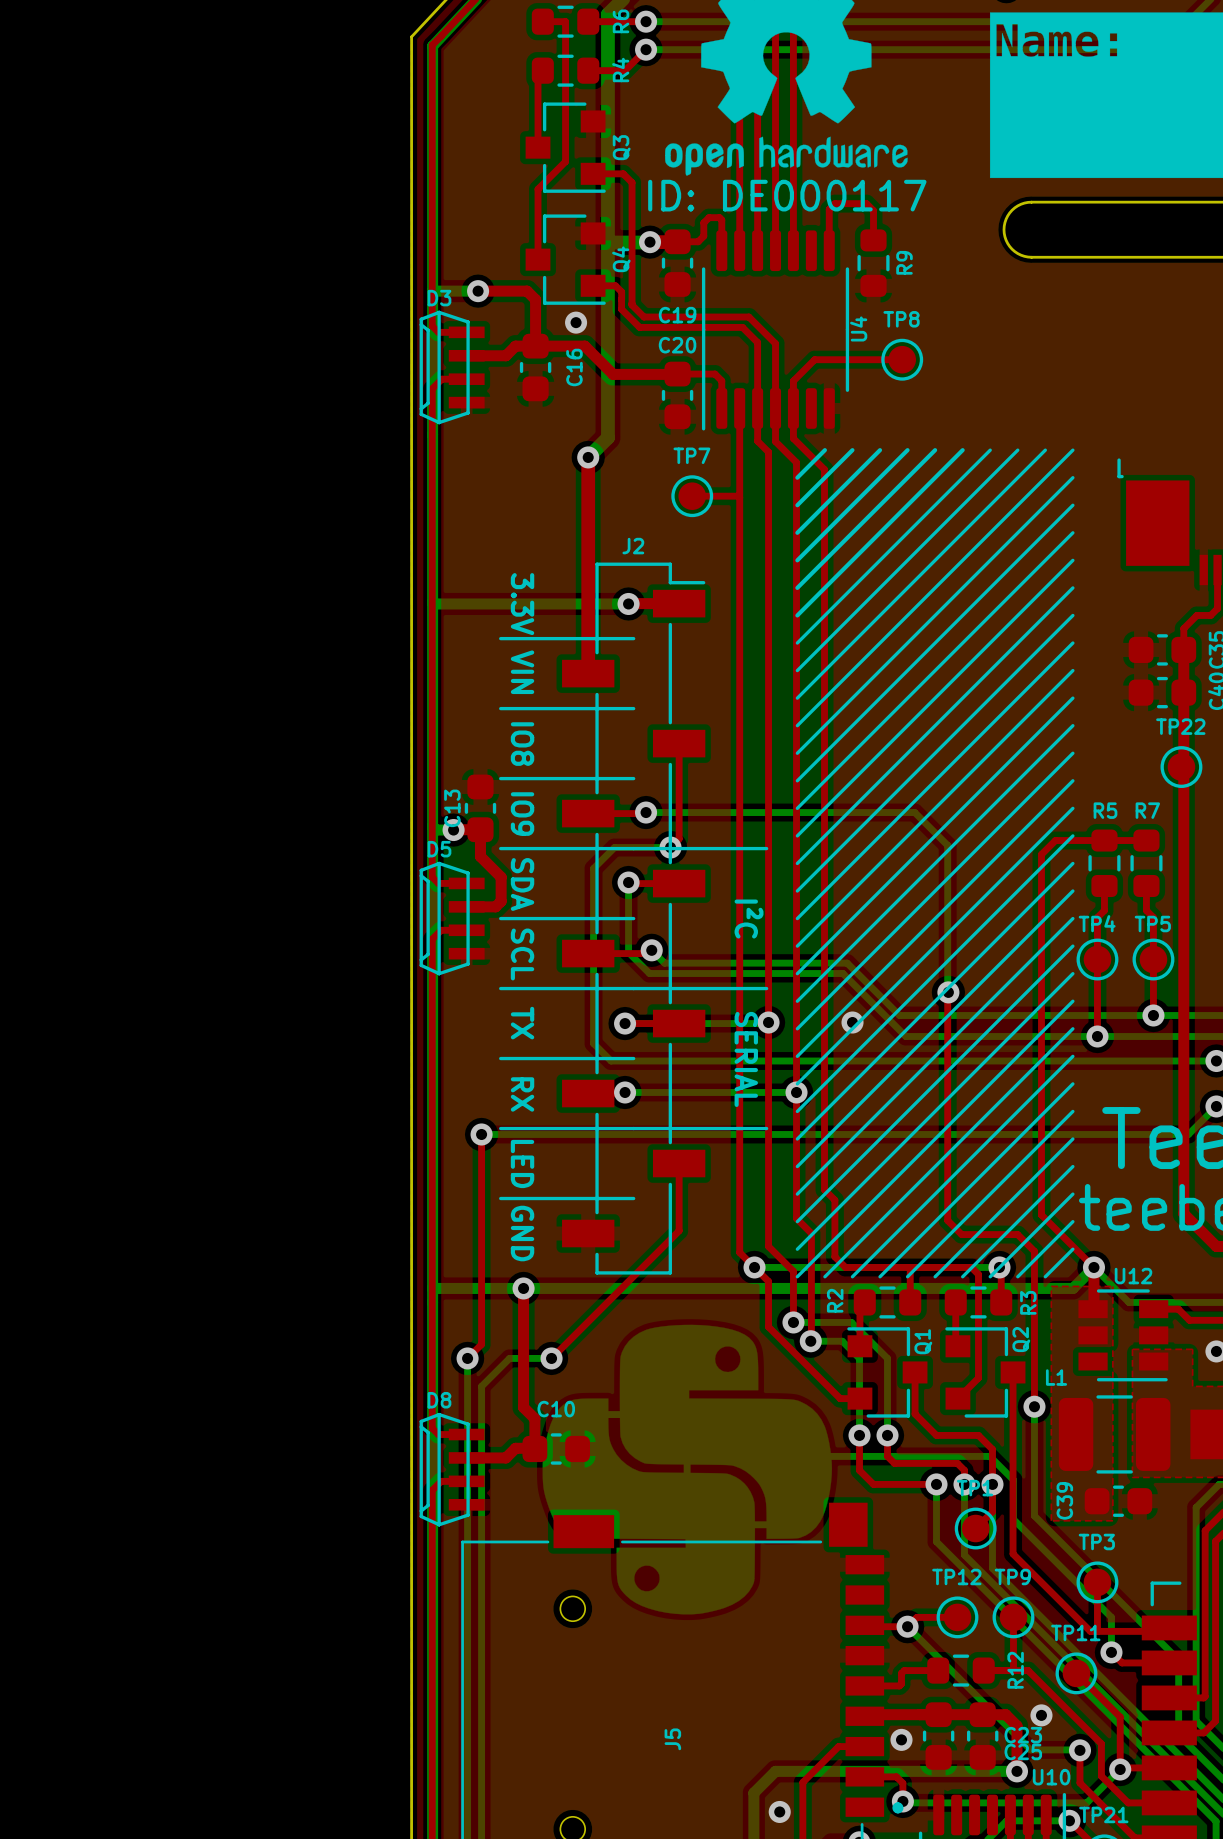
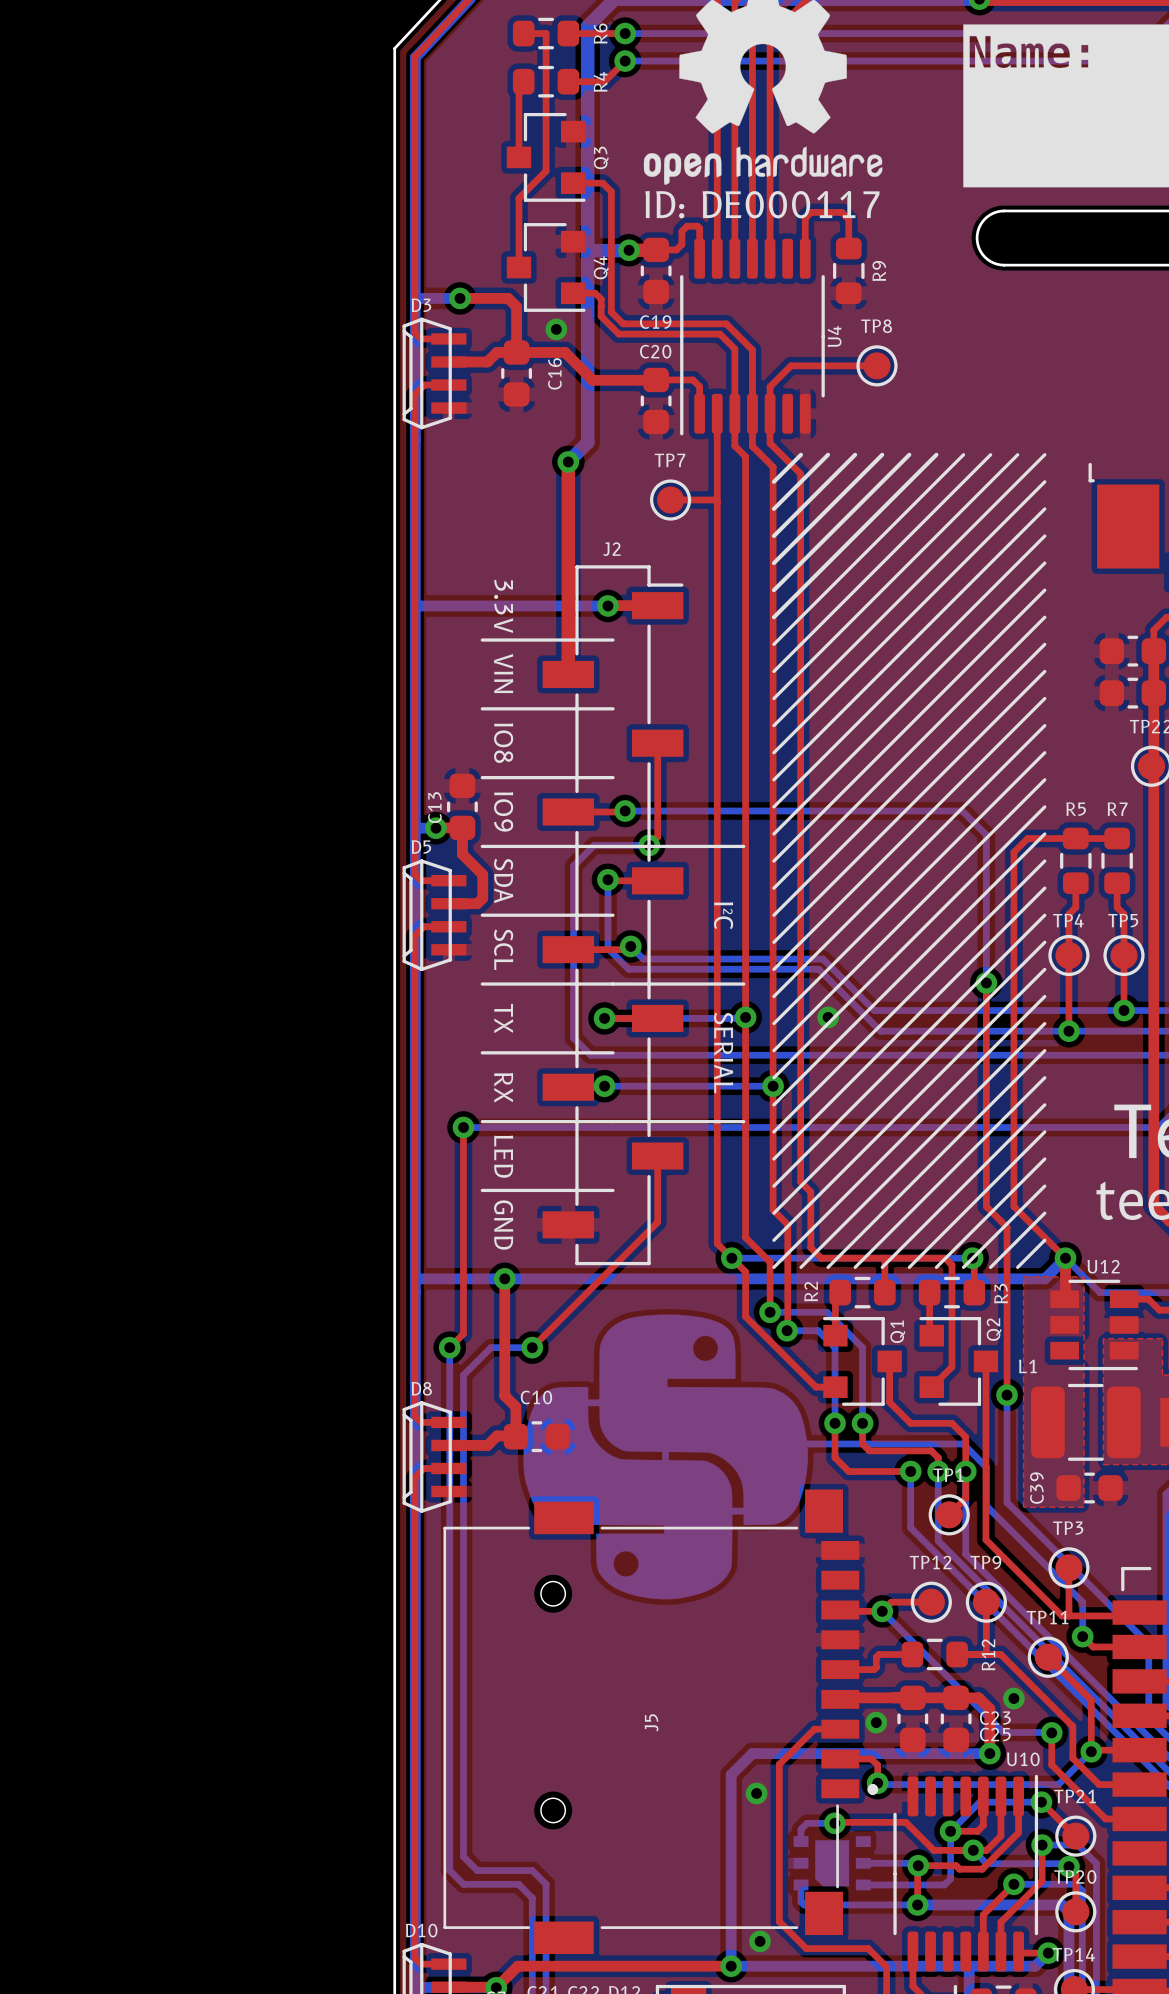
bottom track: (914, 812) (947, 845) (948, 992) -> (889, 811) (962, 811) (986, 835) (986, 983)
top track: (948, 992) (947, 1220) (961, 1234) (1017, 1234) (1034, 1251) -> (986, 983) (986, 1206) (1007, 1227) (1007, 1242)
via position: (948, 992) -> (986, 983)

